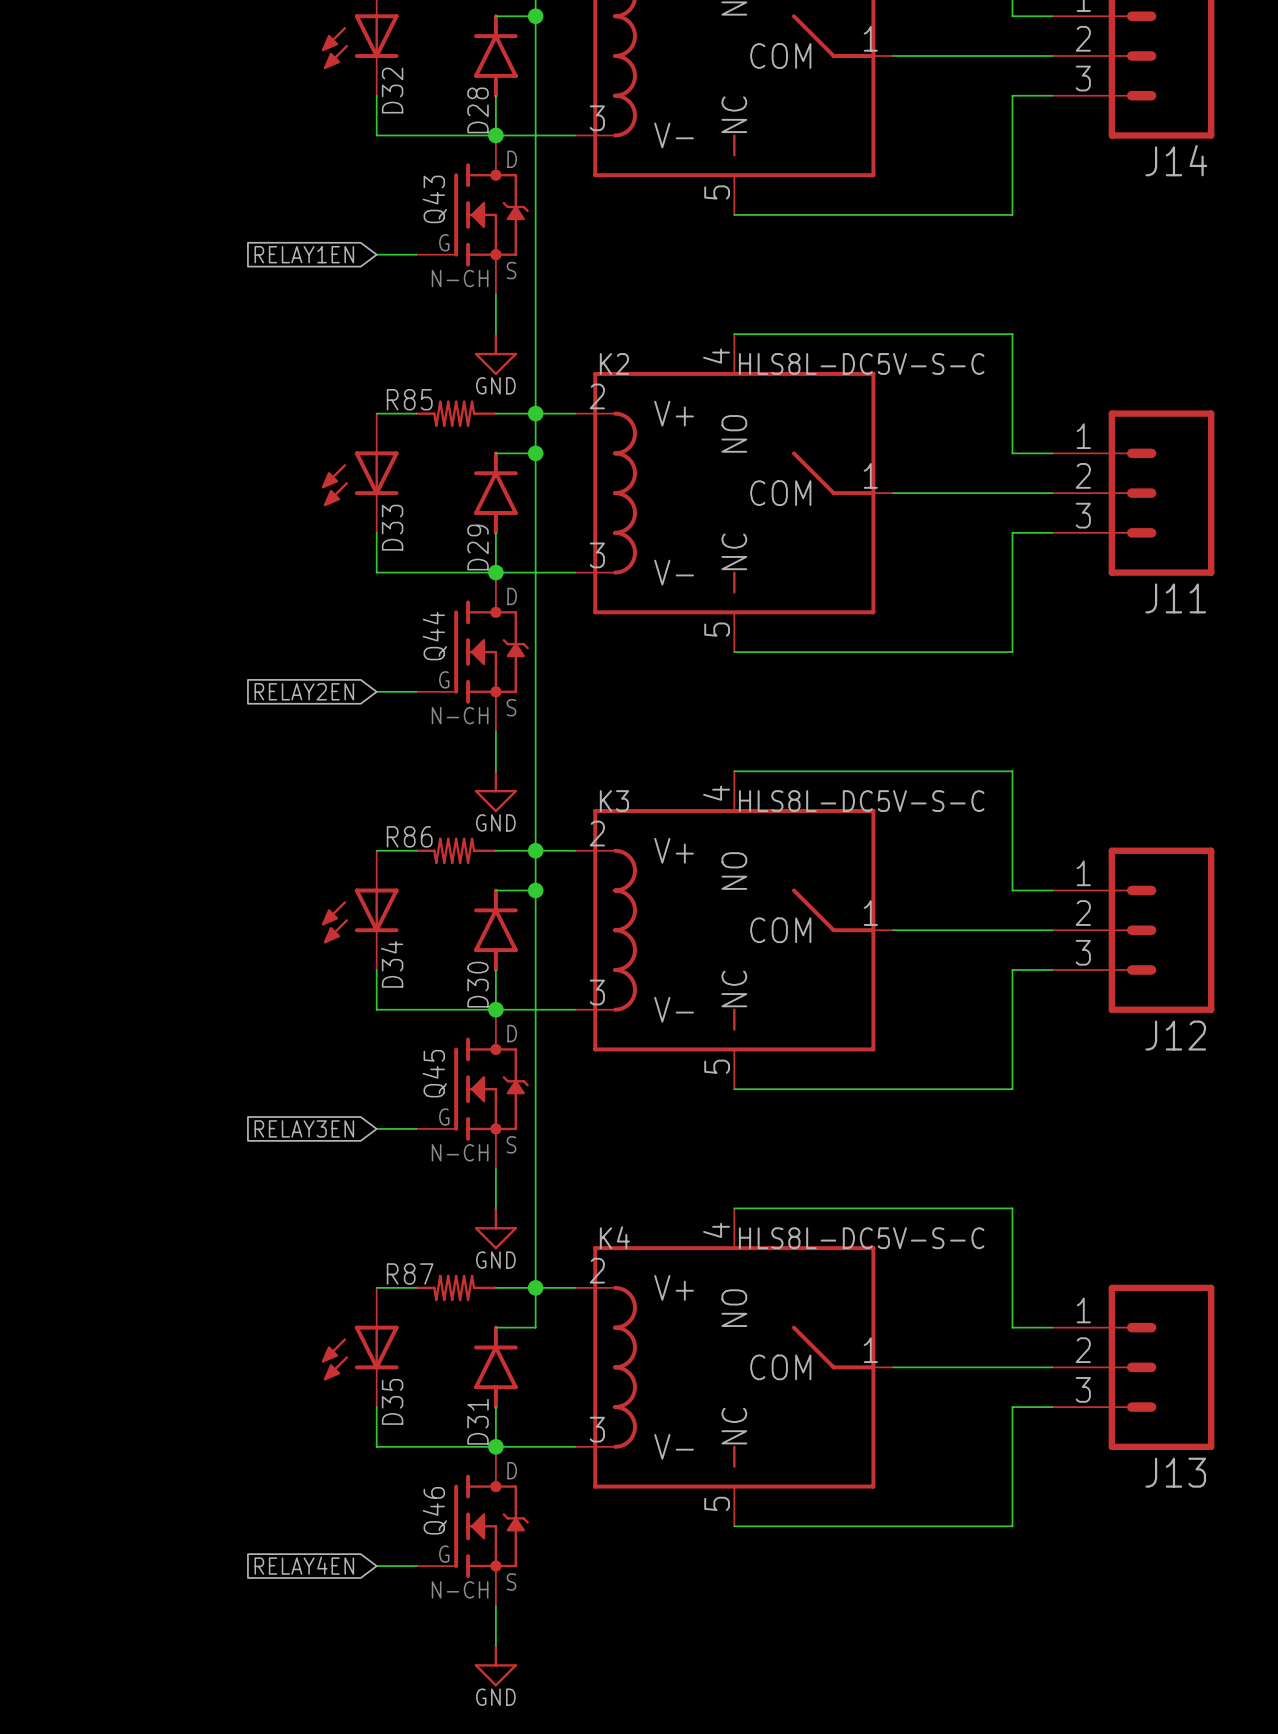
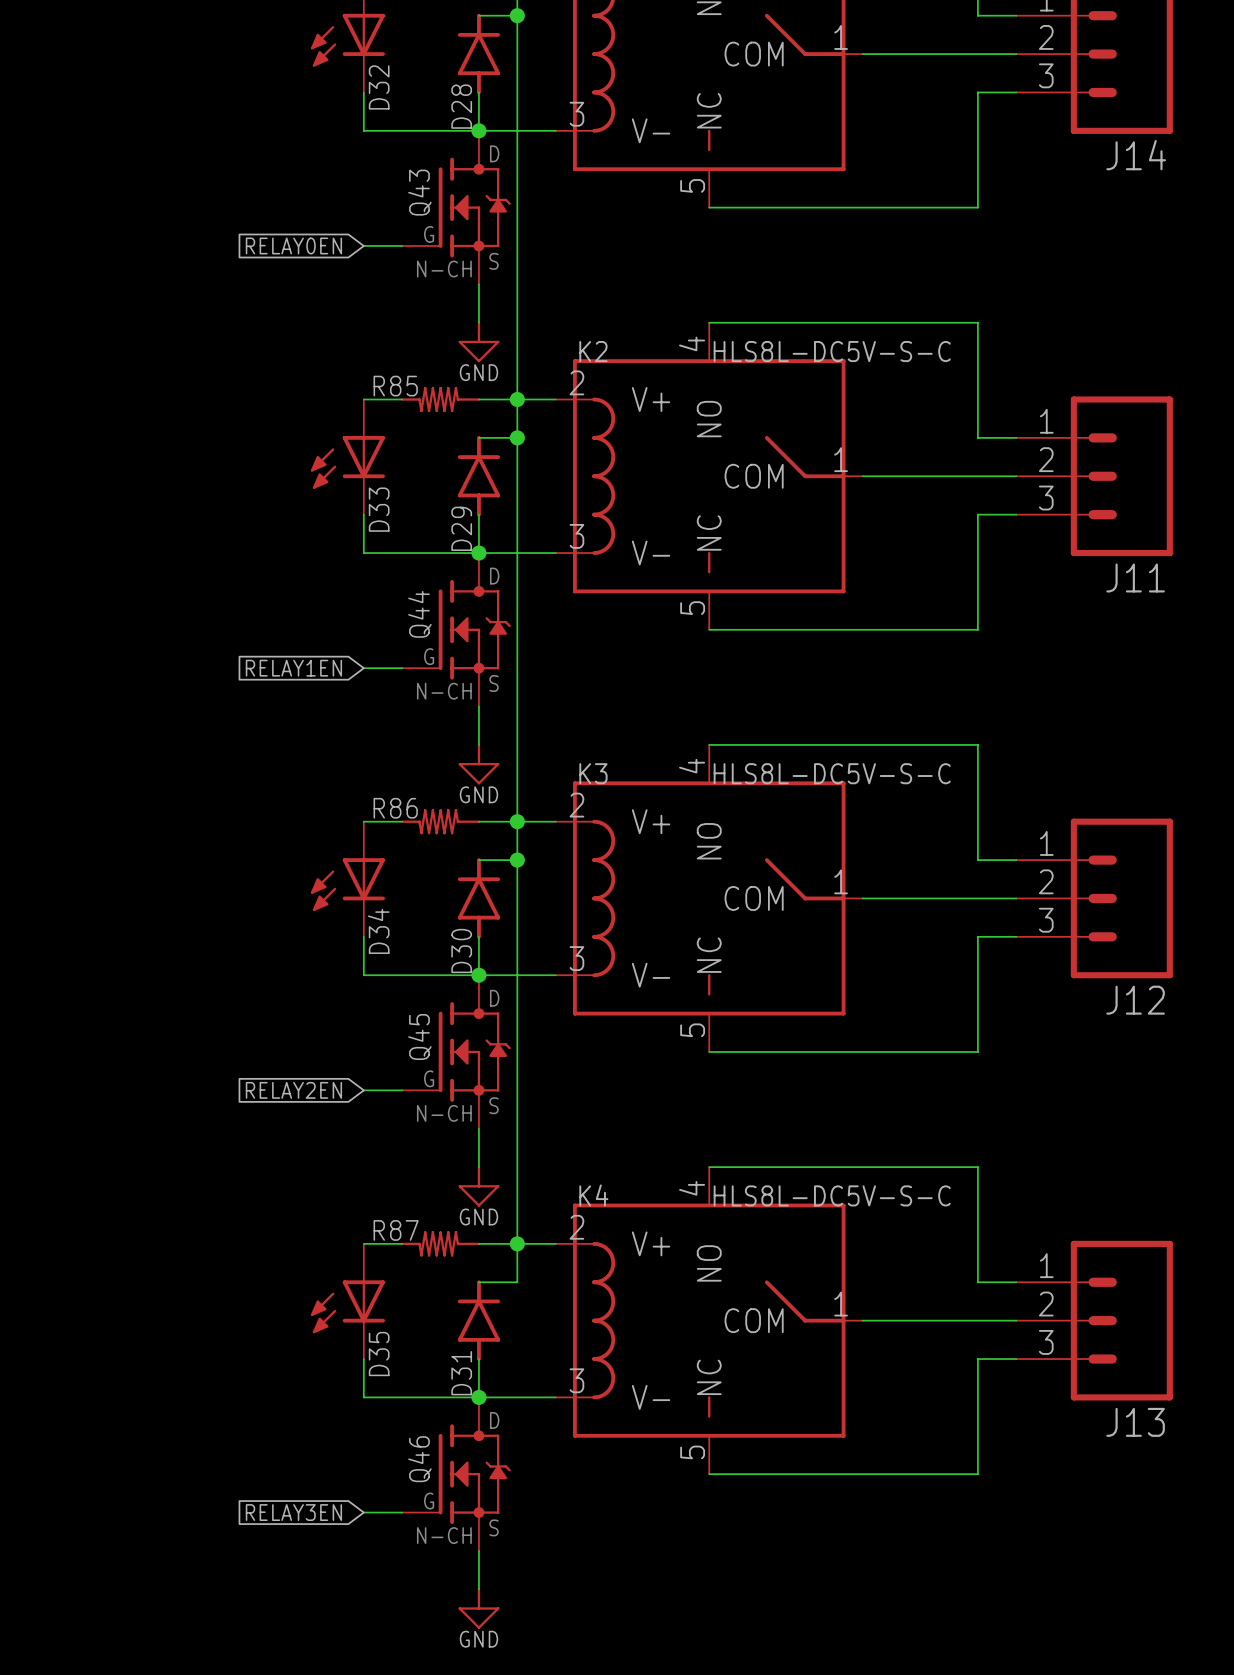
global label: RELAY1EN (304, 254) -> RELAY0EN (293, 245)
global label: RELAY2EN (304, 691) -> RELAY1EN (293, 668)
global label: RELAY3EN (304, 1128) -> RELAY2EN (293, 1090)
global label: RELAY4EN (304, 1565) -> RELAY3EN (293, 1512)

